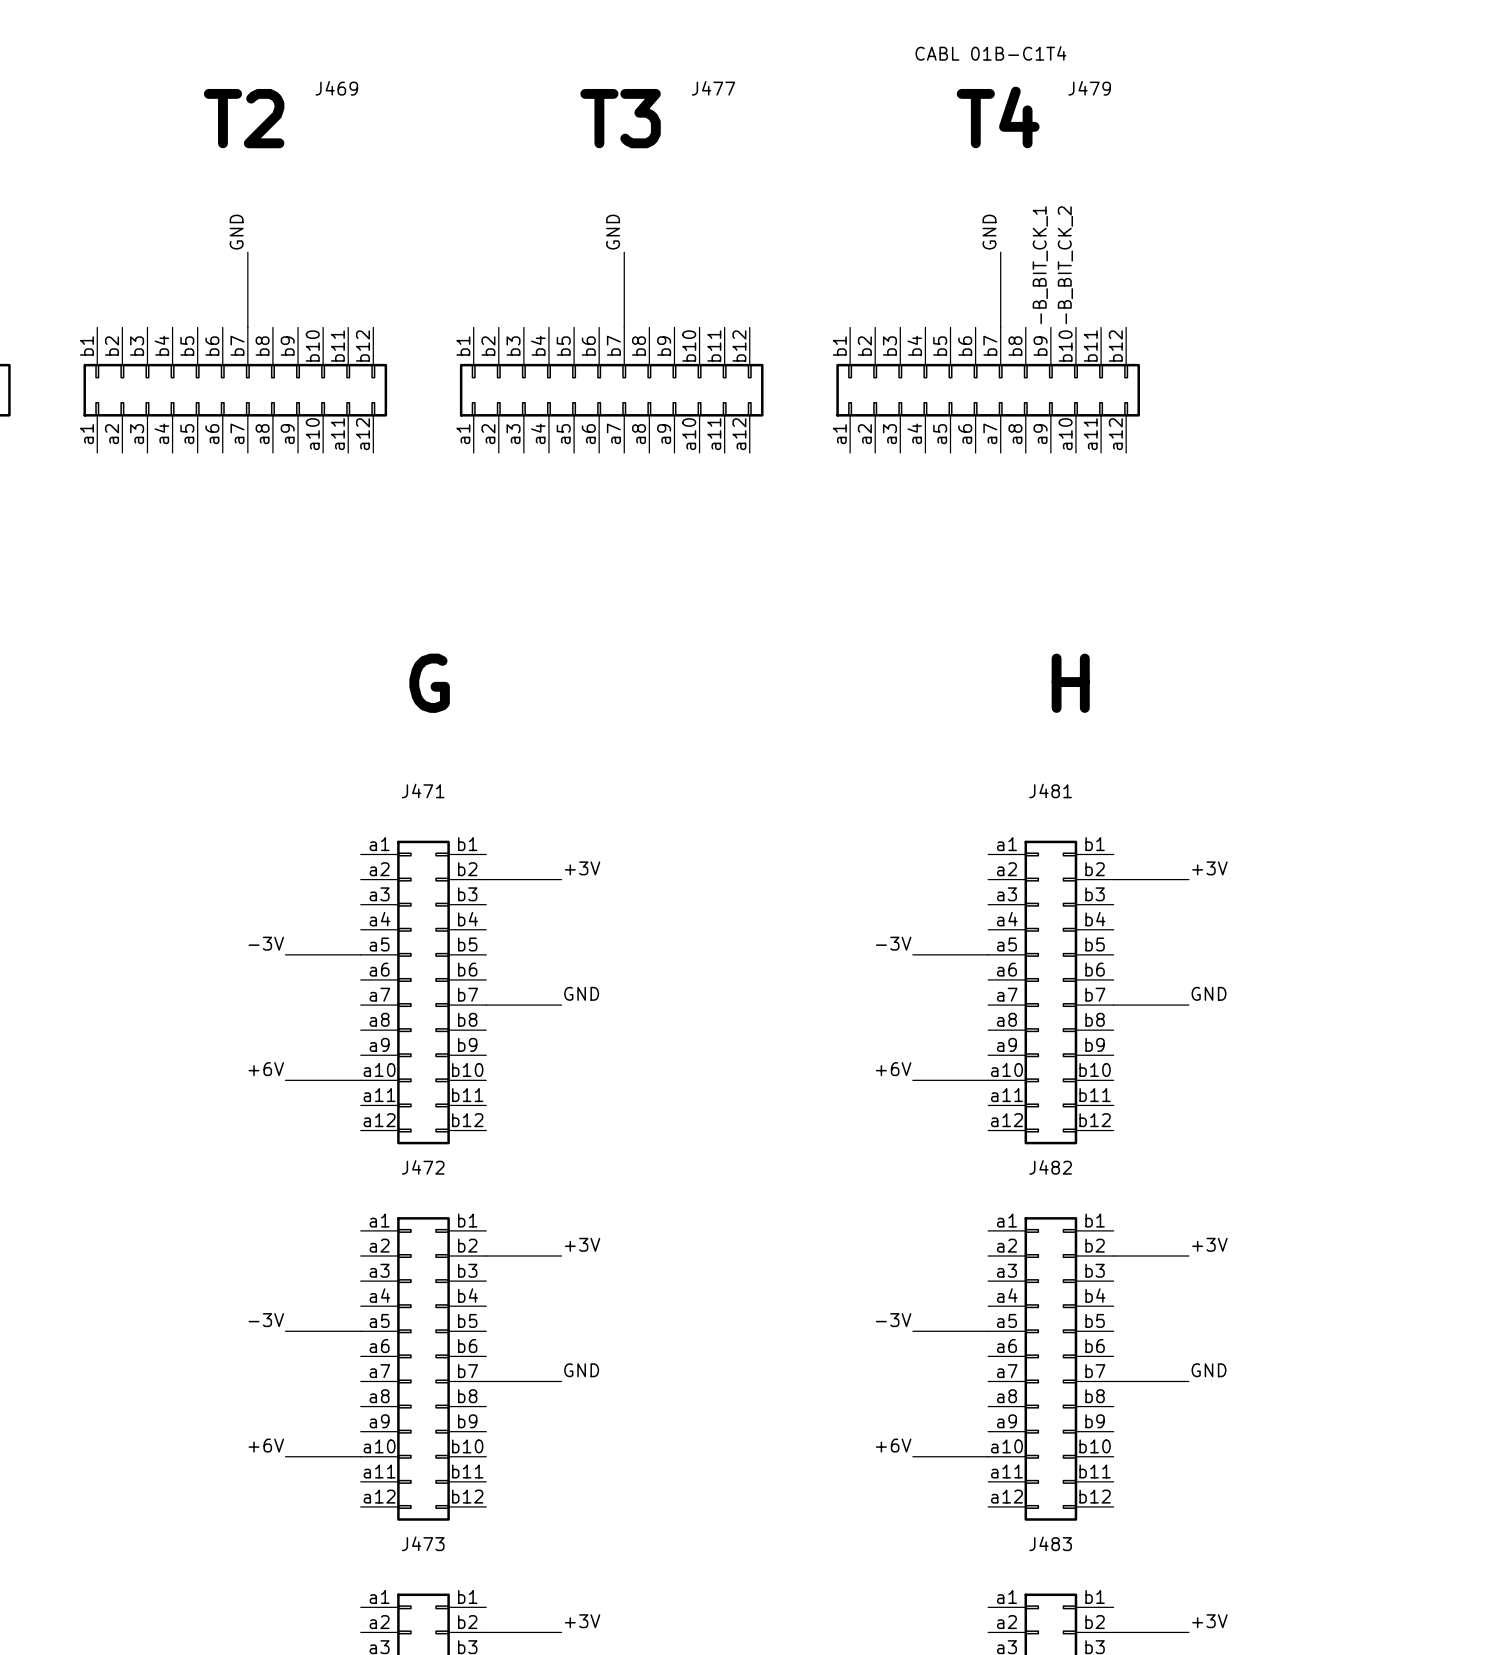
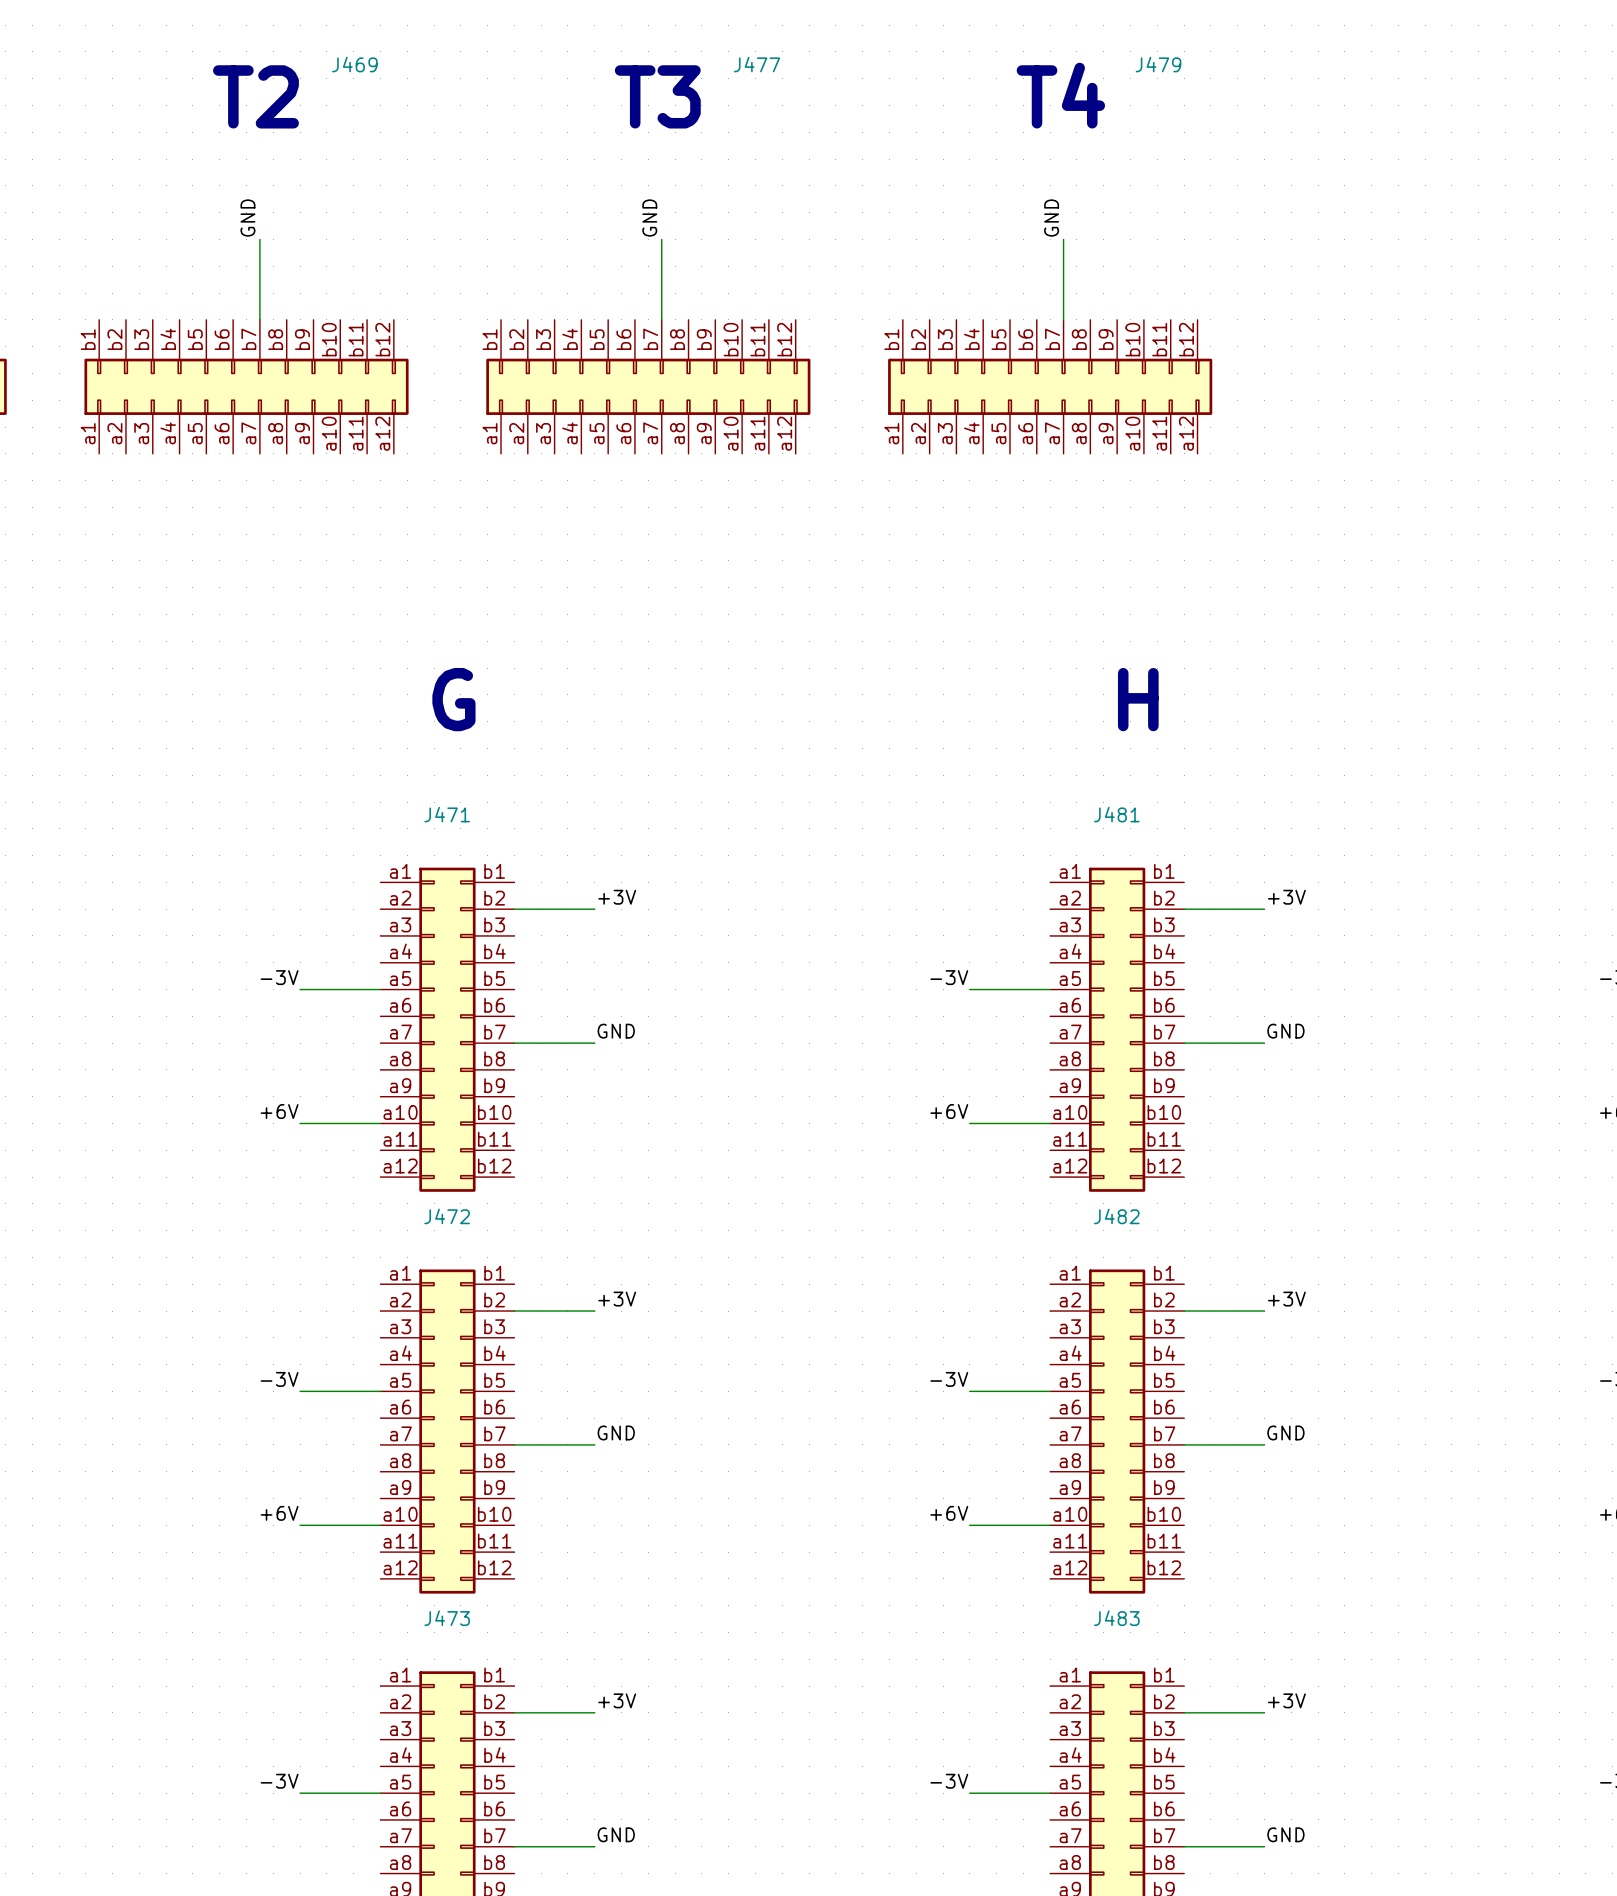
text: CABL 01B-C1T4 (990, 53) -> none
label: -B_BIT_CK_1 (1040, 265) -> none
label: -B_BIT_CK_2 (1065, 265) -> none

